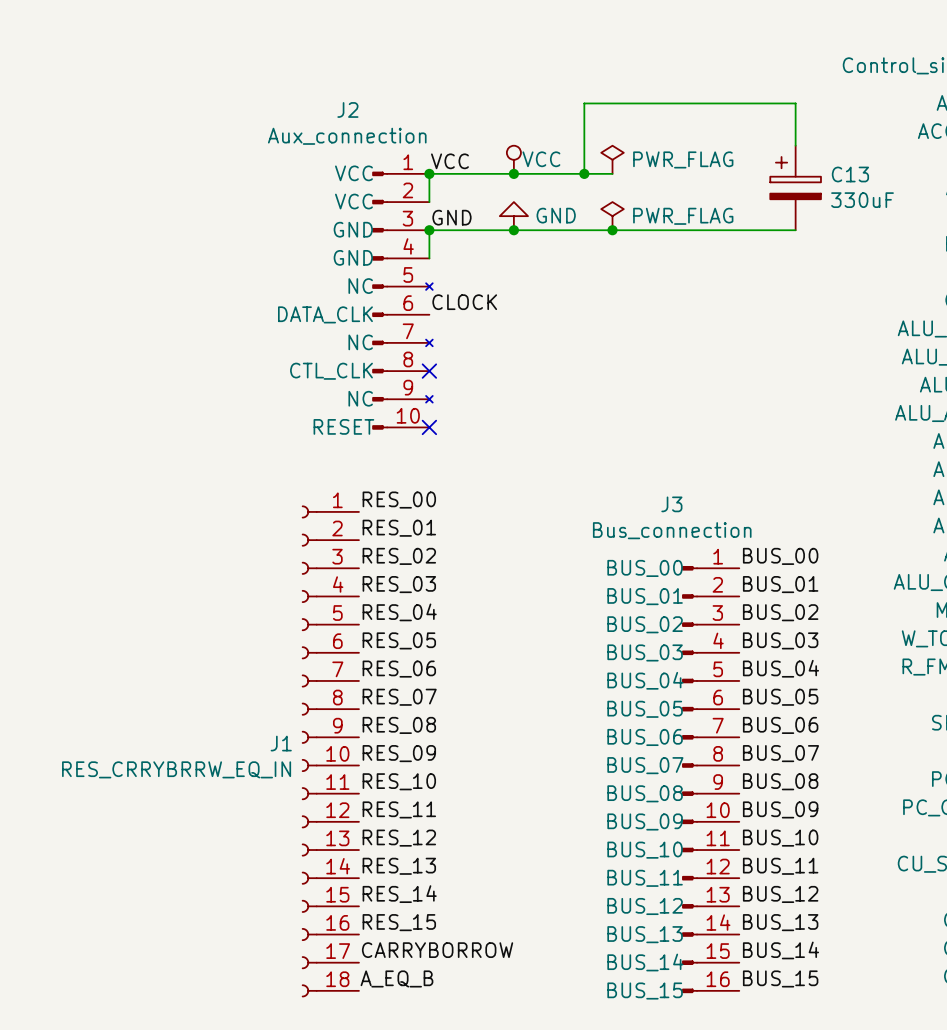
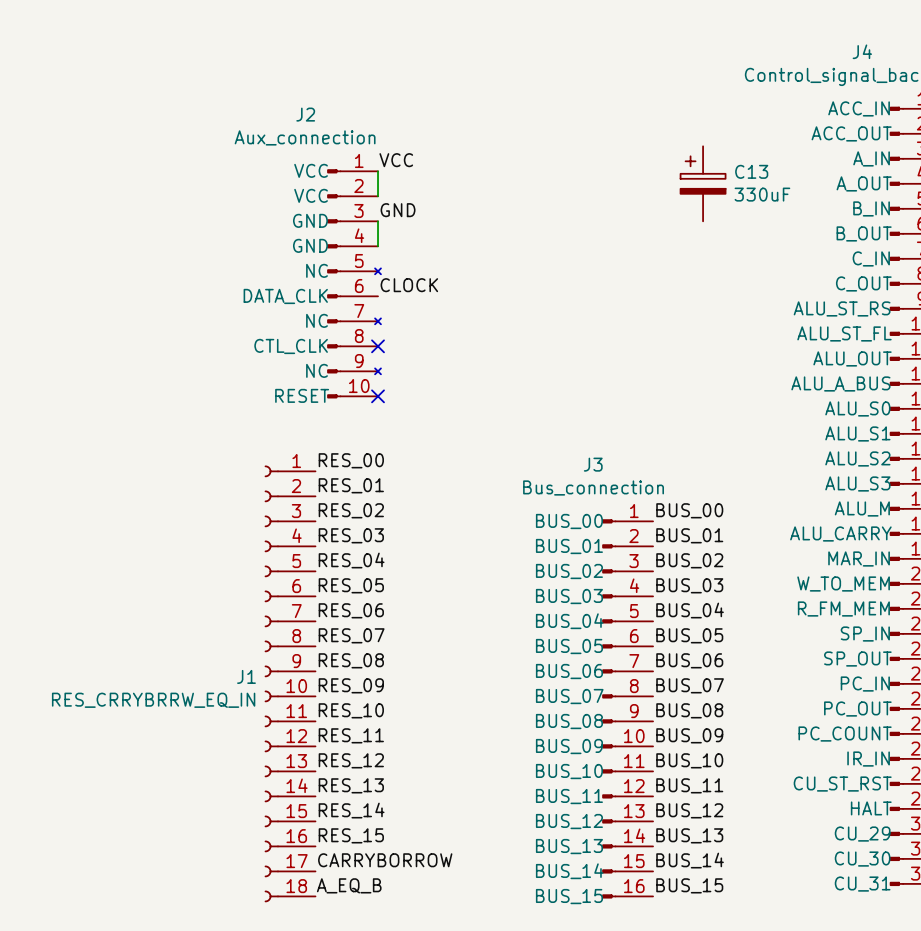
wire: (795, 145) (795, 103) (584, 103) (584, 173) -> none
power symbol: VCC (513, 159) -> none
power symbol: PWR_FLAG (612, 159) -> none
wire: (429, 173) (612, 173) -> none
junction: (429, 173) -> none
junction: (513, 173) -> none
junction: (584, 173) -> none
power symbol: GND (513, 216) -> none
power symbol: PWR_FLAG (612, 216) -> none
wire: (429, 230) (795, 230) -> none
junction: (429, 230) -> none
junction: (513, 230) -> none
junction: (612, 230) -> none

